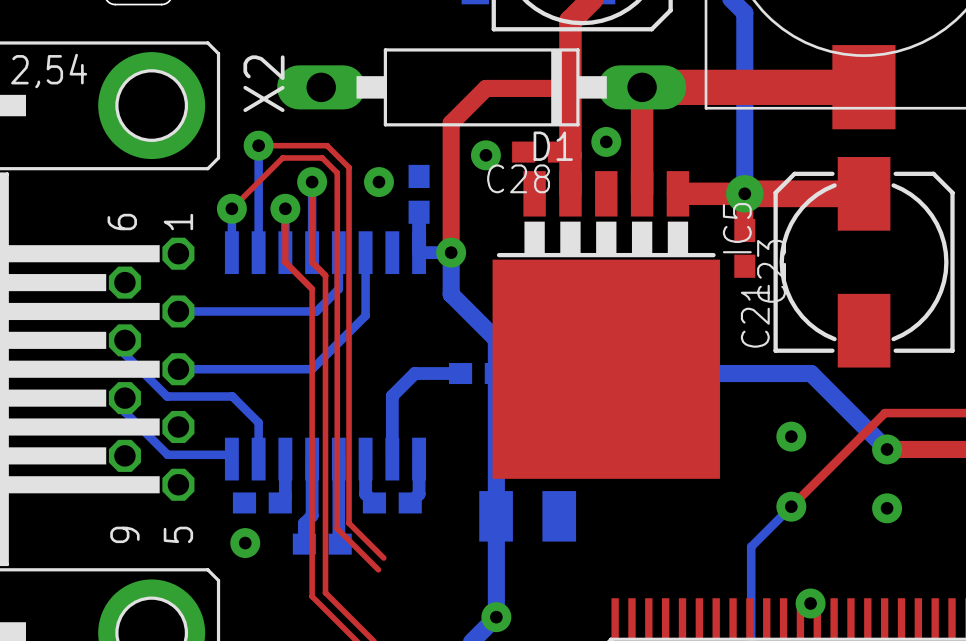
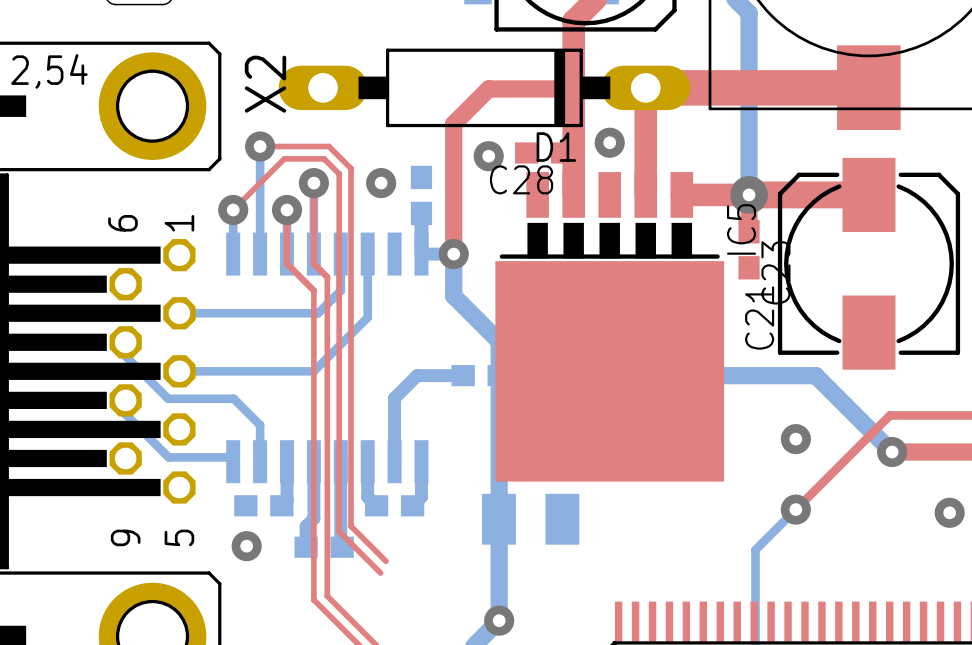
via position: (887, 508) -> (949, 512)
via: (810, 603) -> none

